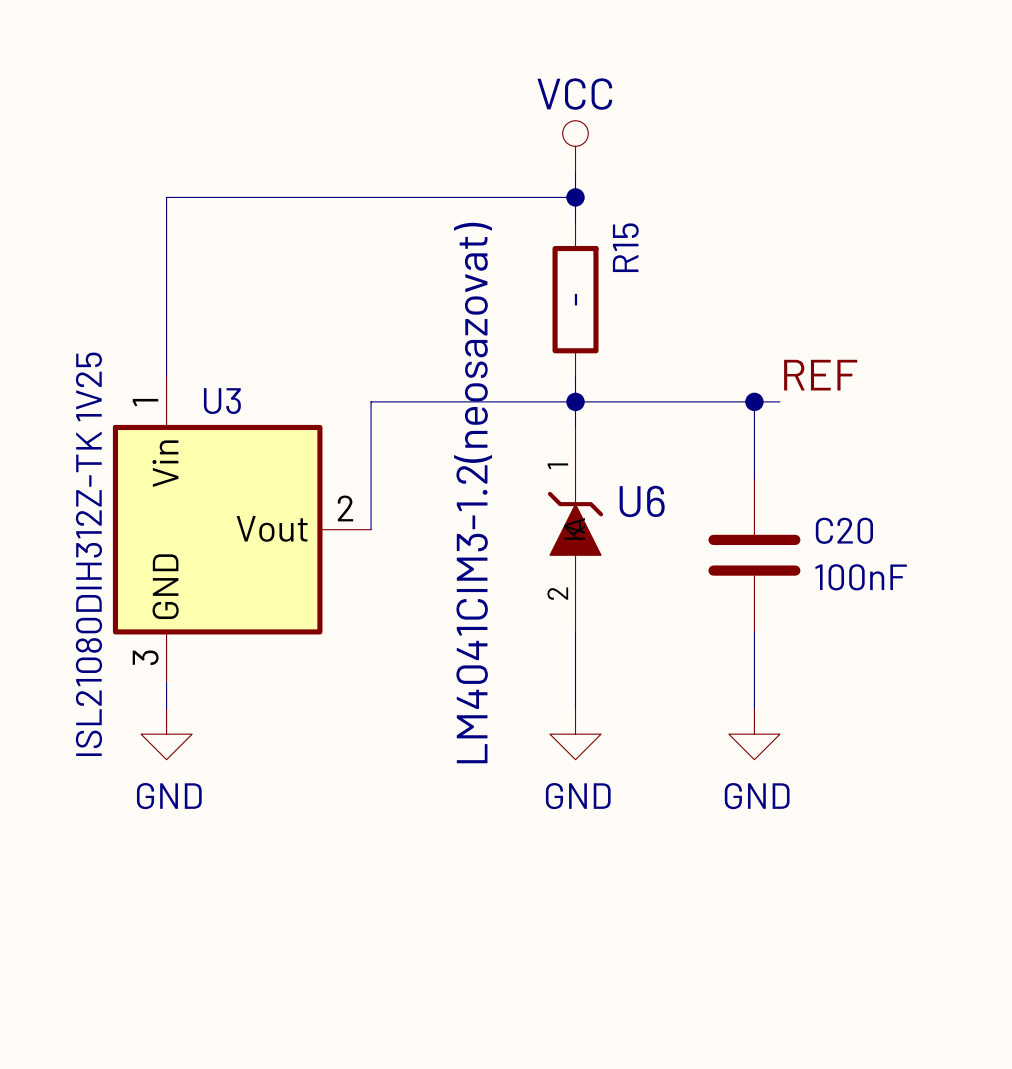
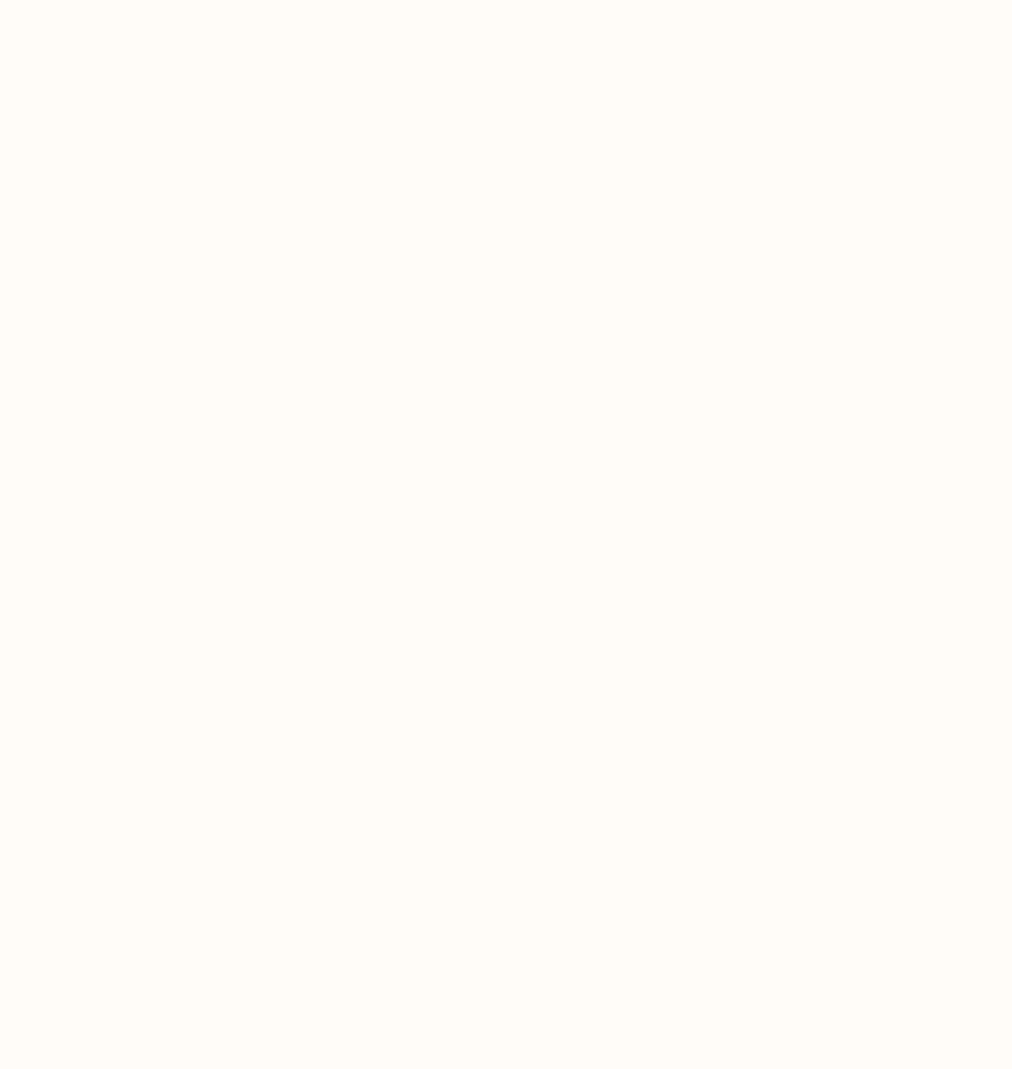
power symbol: VCC (575, 146) -> none
wire: (575, 171) (575, 222) -> none
wire: (575, 197) (166, 197) (166, 376) -> none
junction: (575, 197) -> none
R15: - (575, 299) -> none
label: REF (820, 375) -> none
wire: (575, 376) (575, 427) -> none
junction: (575, 401) -> none
wire: (754, 401) (754, 478) -> none
junction: (754, 401) -> none
wire: (779, 401) (371, 401) (371, 529) -> none
U3: ISL21080DIH312Z-TK 1V25 (241, 529) -> none
U6: LM4041CIM3-1.2(neosazovat) (575, 529) -> none
C20: 100nF (754, 555) -> none
wire: (575, 631) (575, 708) -> none
wire: (754, 631) (754, 708) -> none
wire: (166, 683) (166, 708) -> none
power symbol: GND (166, 734) -> none
power symbol: GND (575, 734) -> none
power symbol: GND (754, 734) -> none

